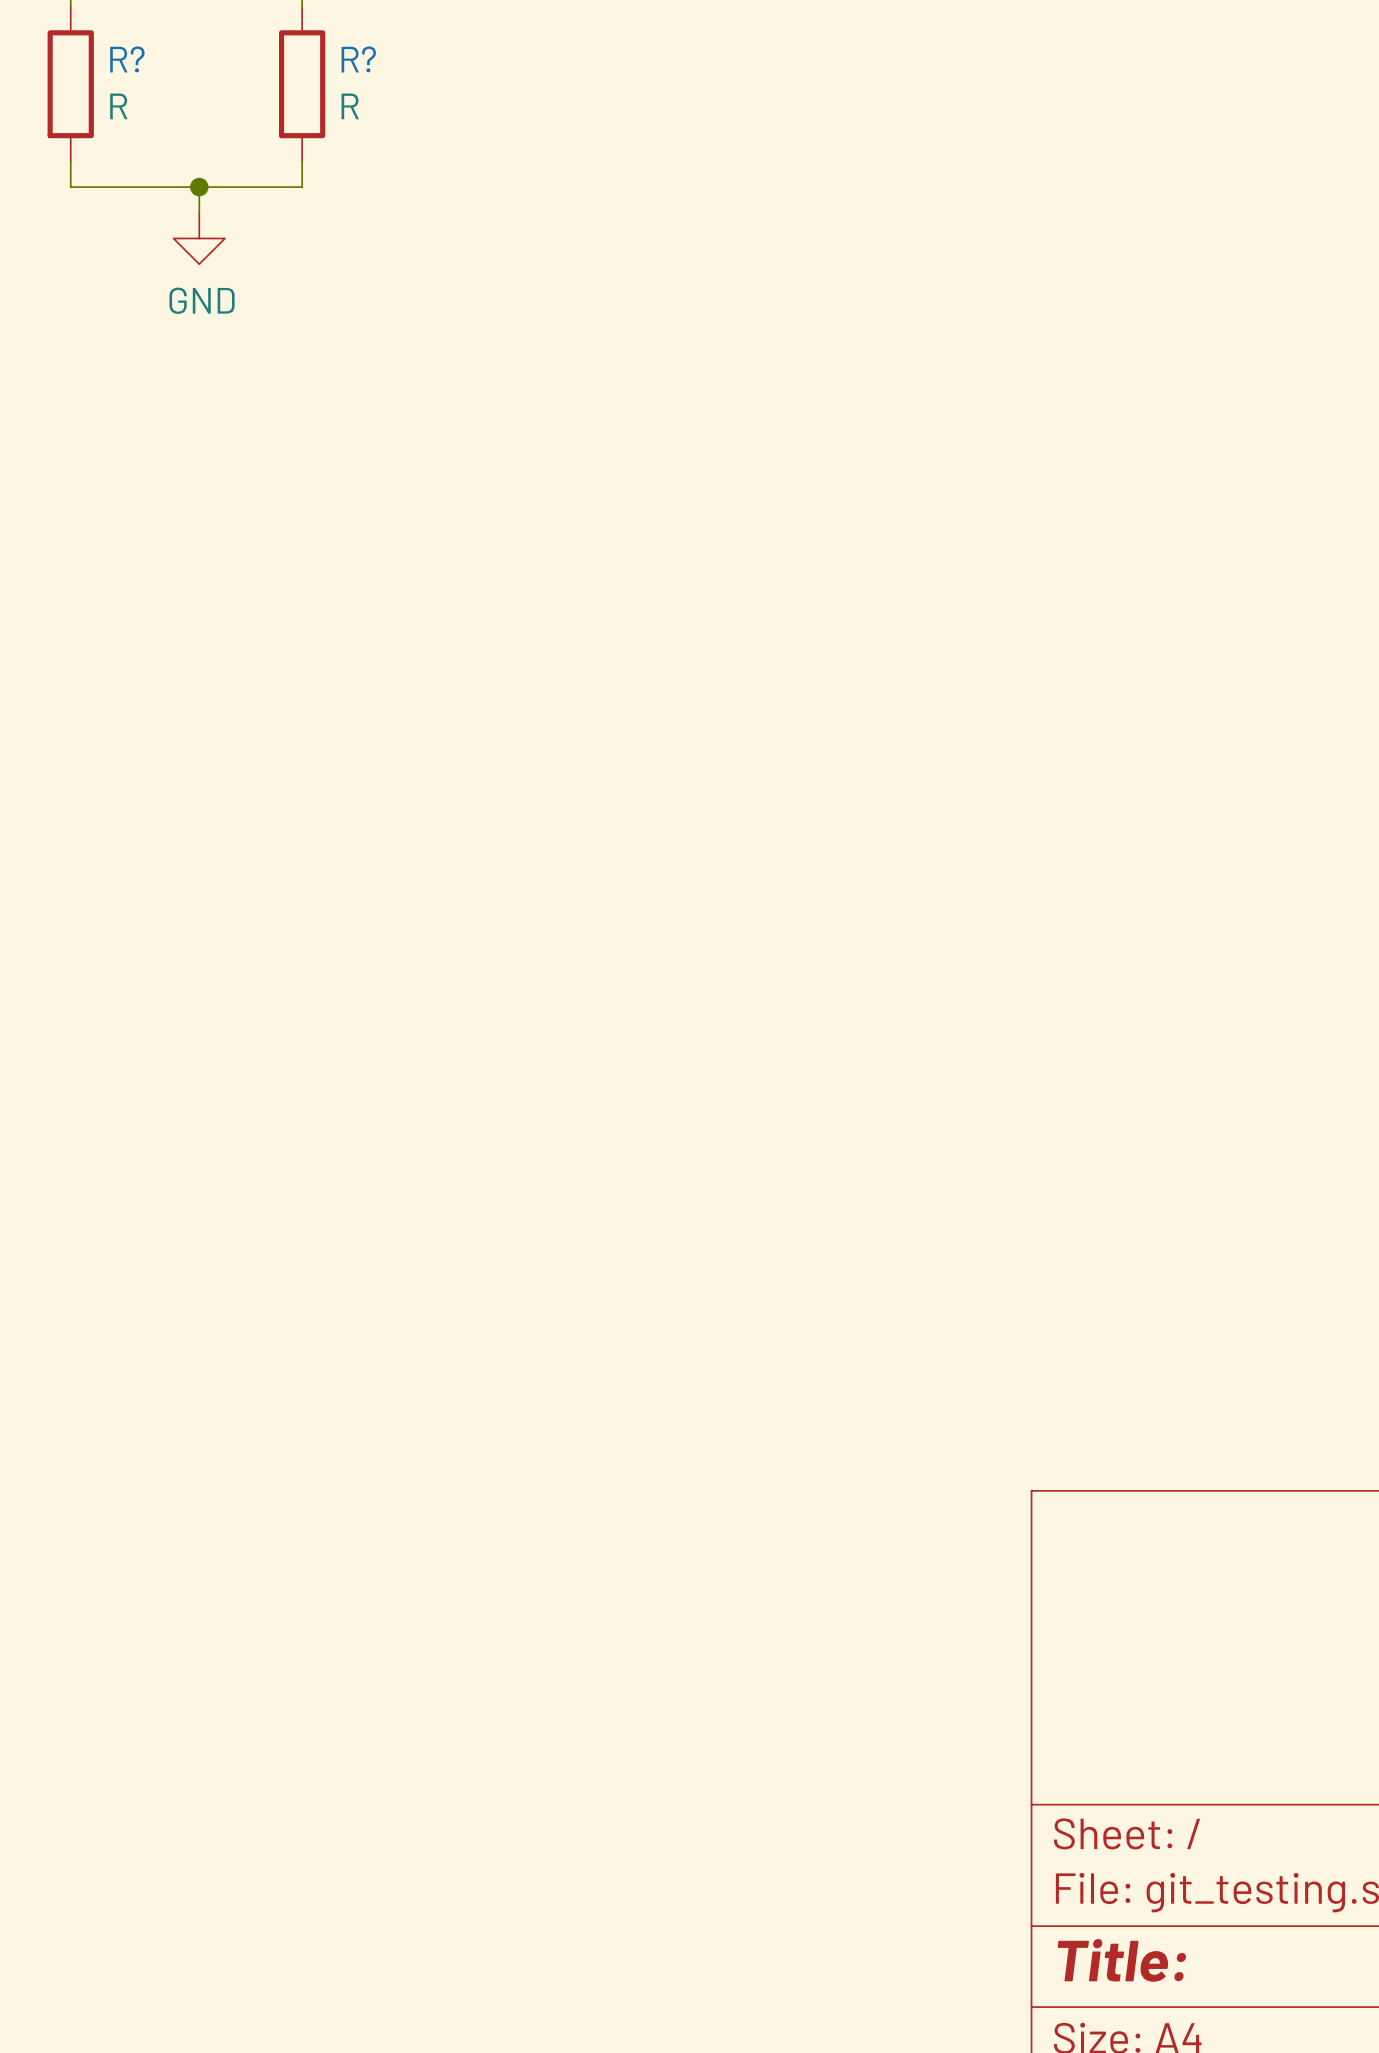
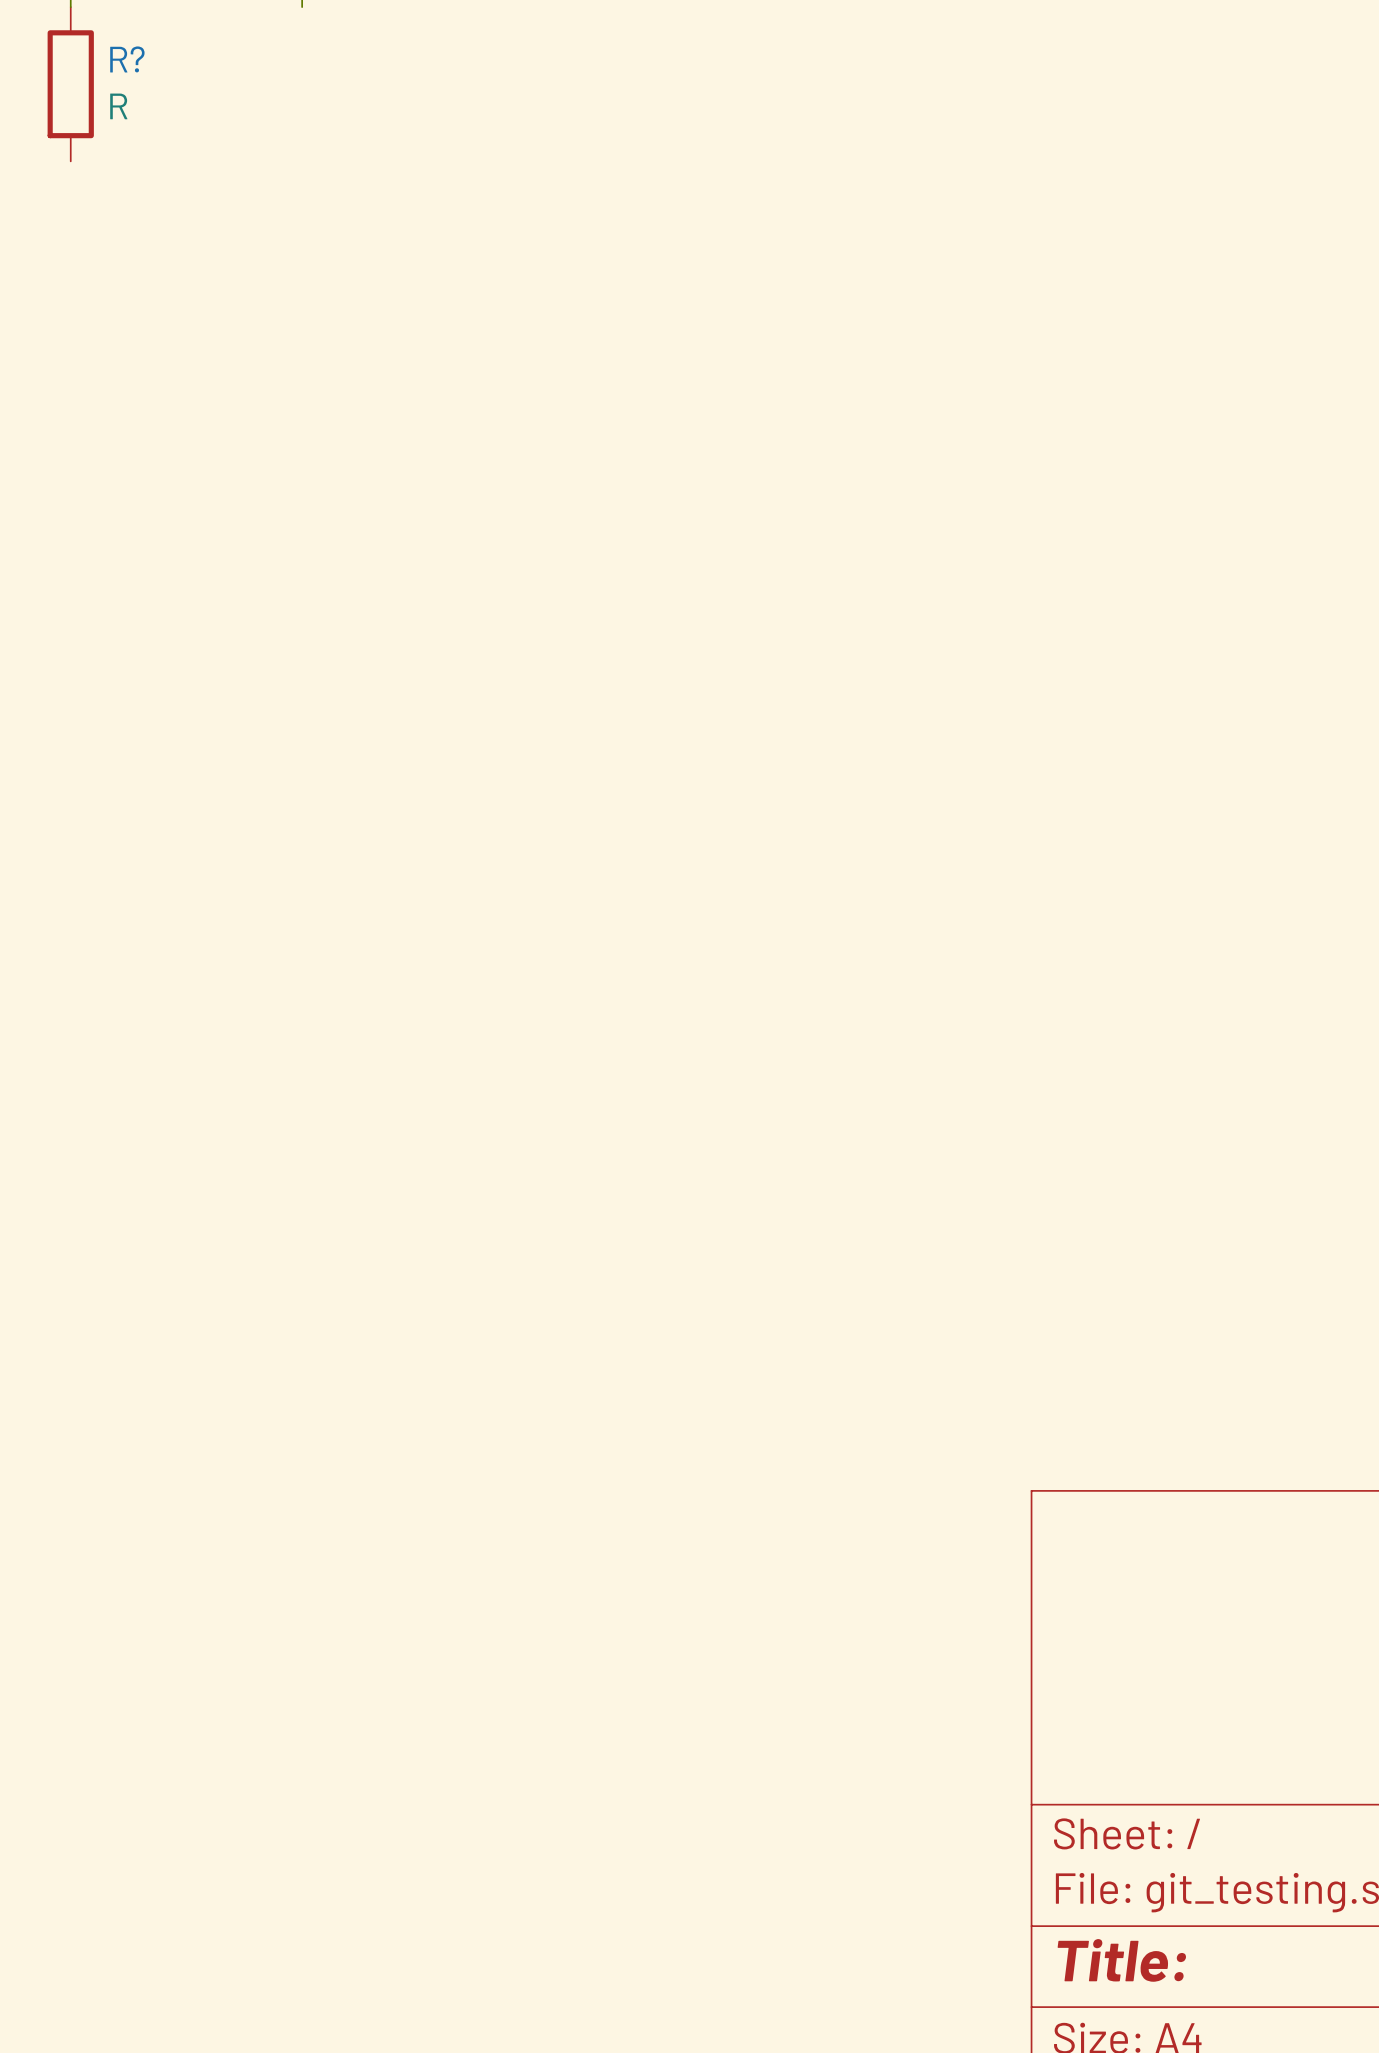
R?: R (302, 84) -> none
wire: (70, 161) (70, 187) (302, 187) (302, 161) -> none
wire: (199, 187) (199, 212) -> none
junction: (199, 187) -> none
power symbol: GND (199, 238) -> none

